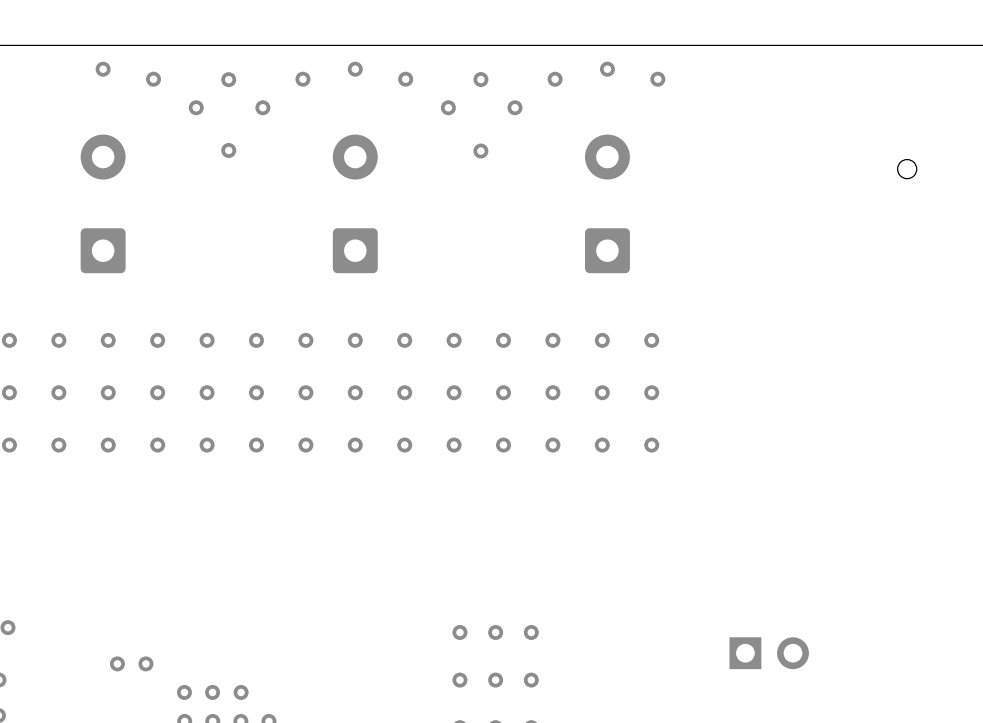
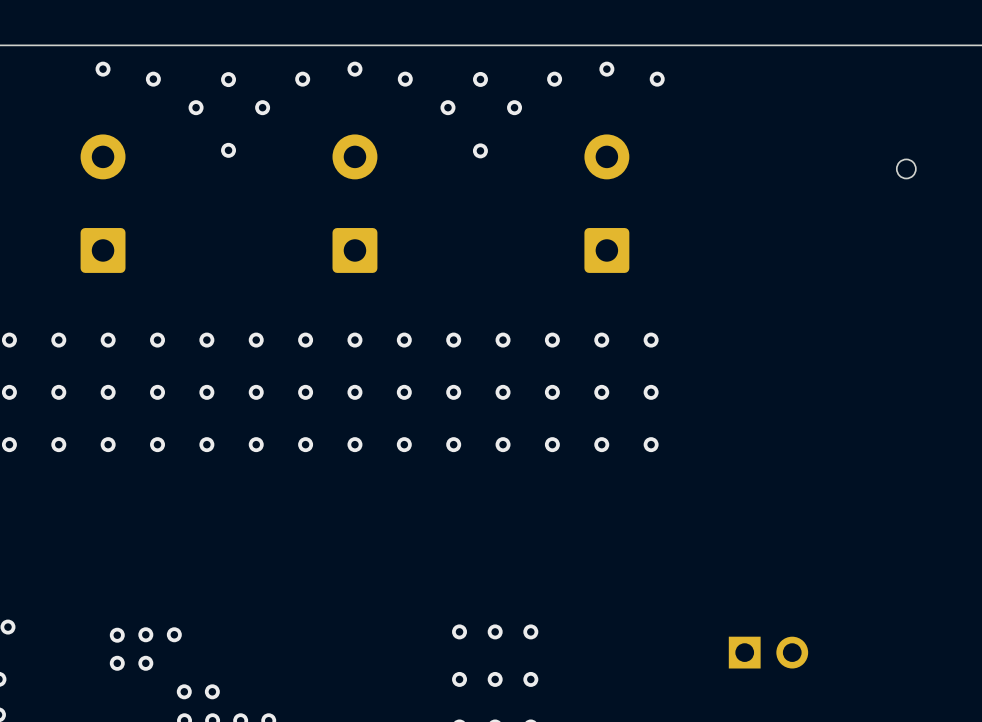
via: none -> (117, 635)
via: none -> (145, 634)
via: none -> (174, 634)
via: (241, 692) -> none

